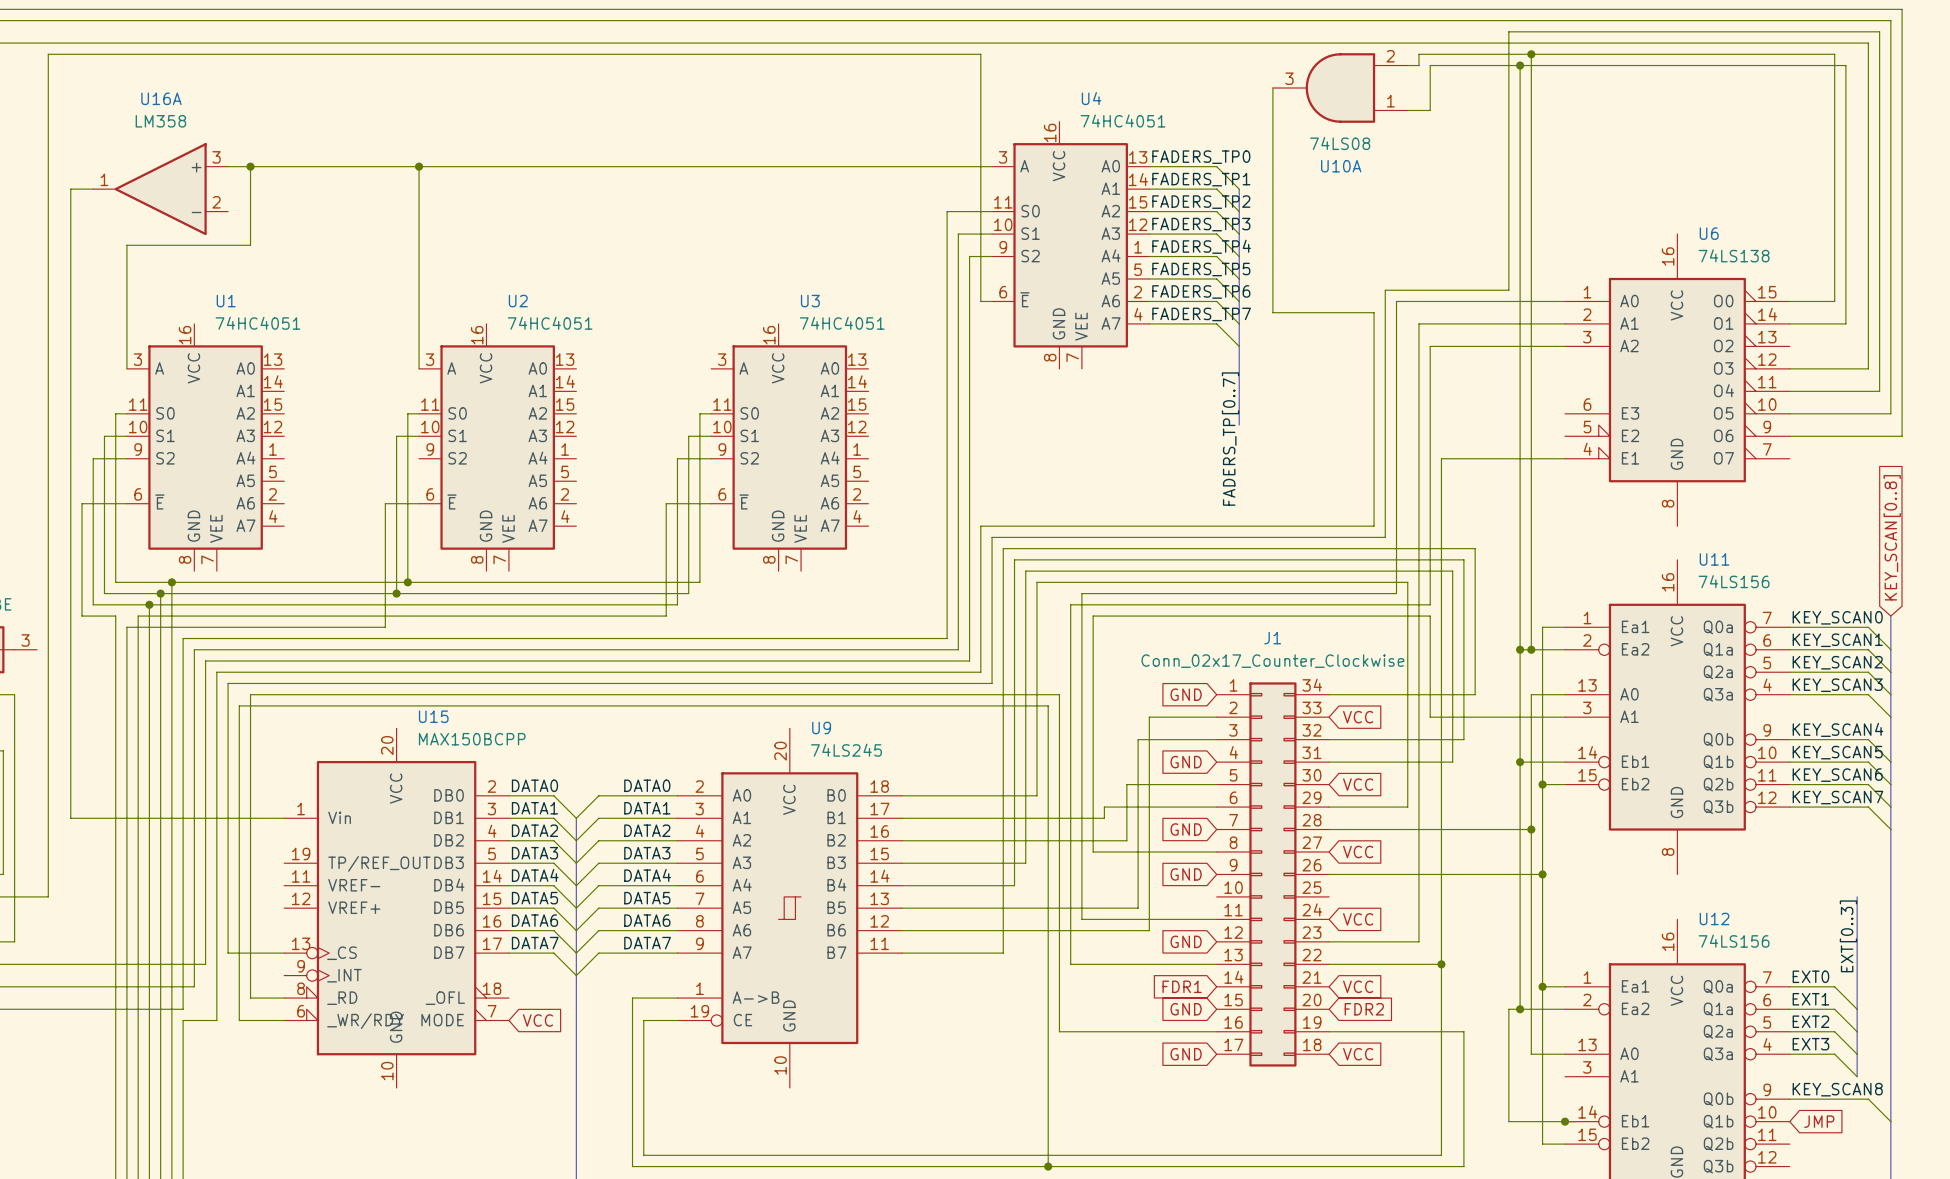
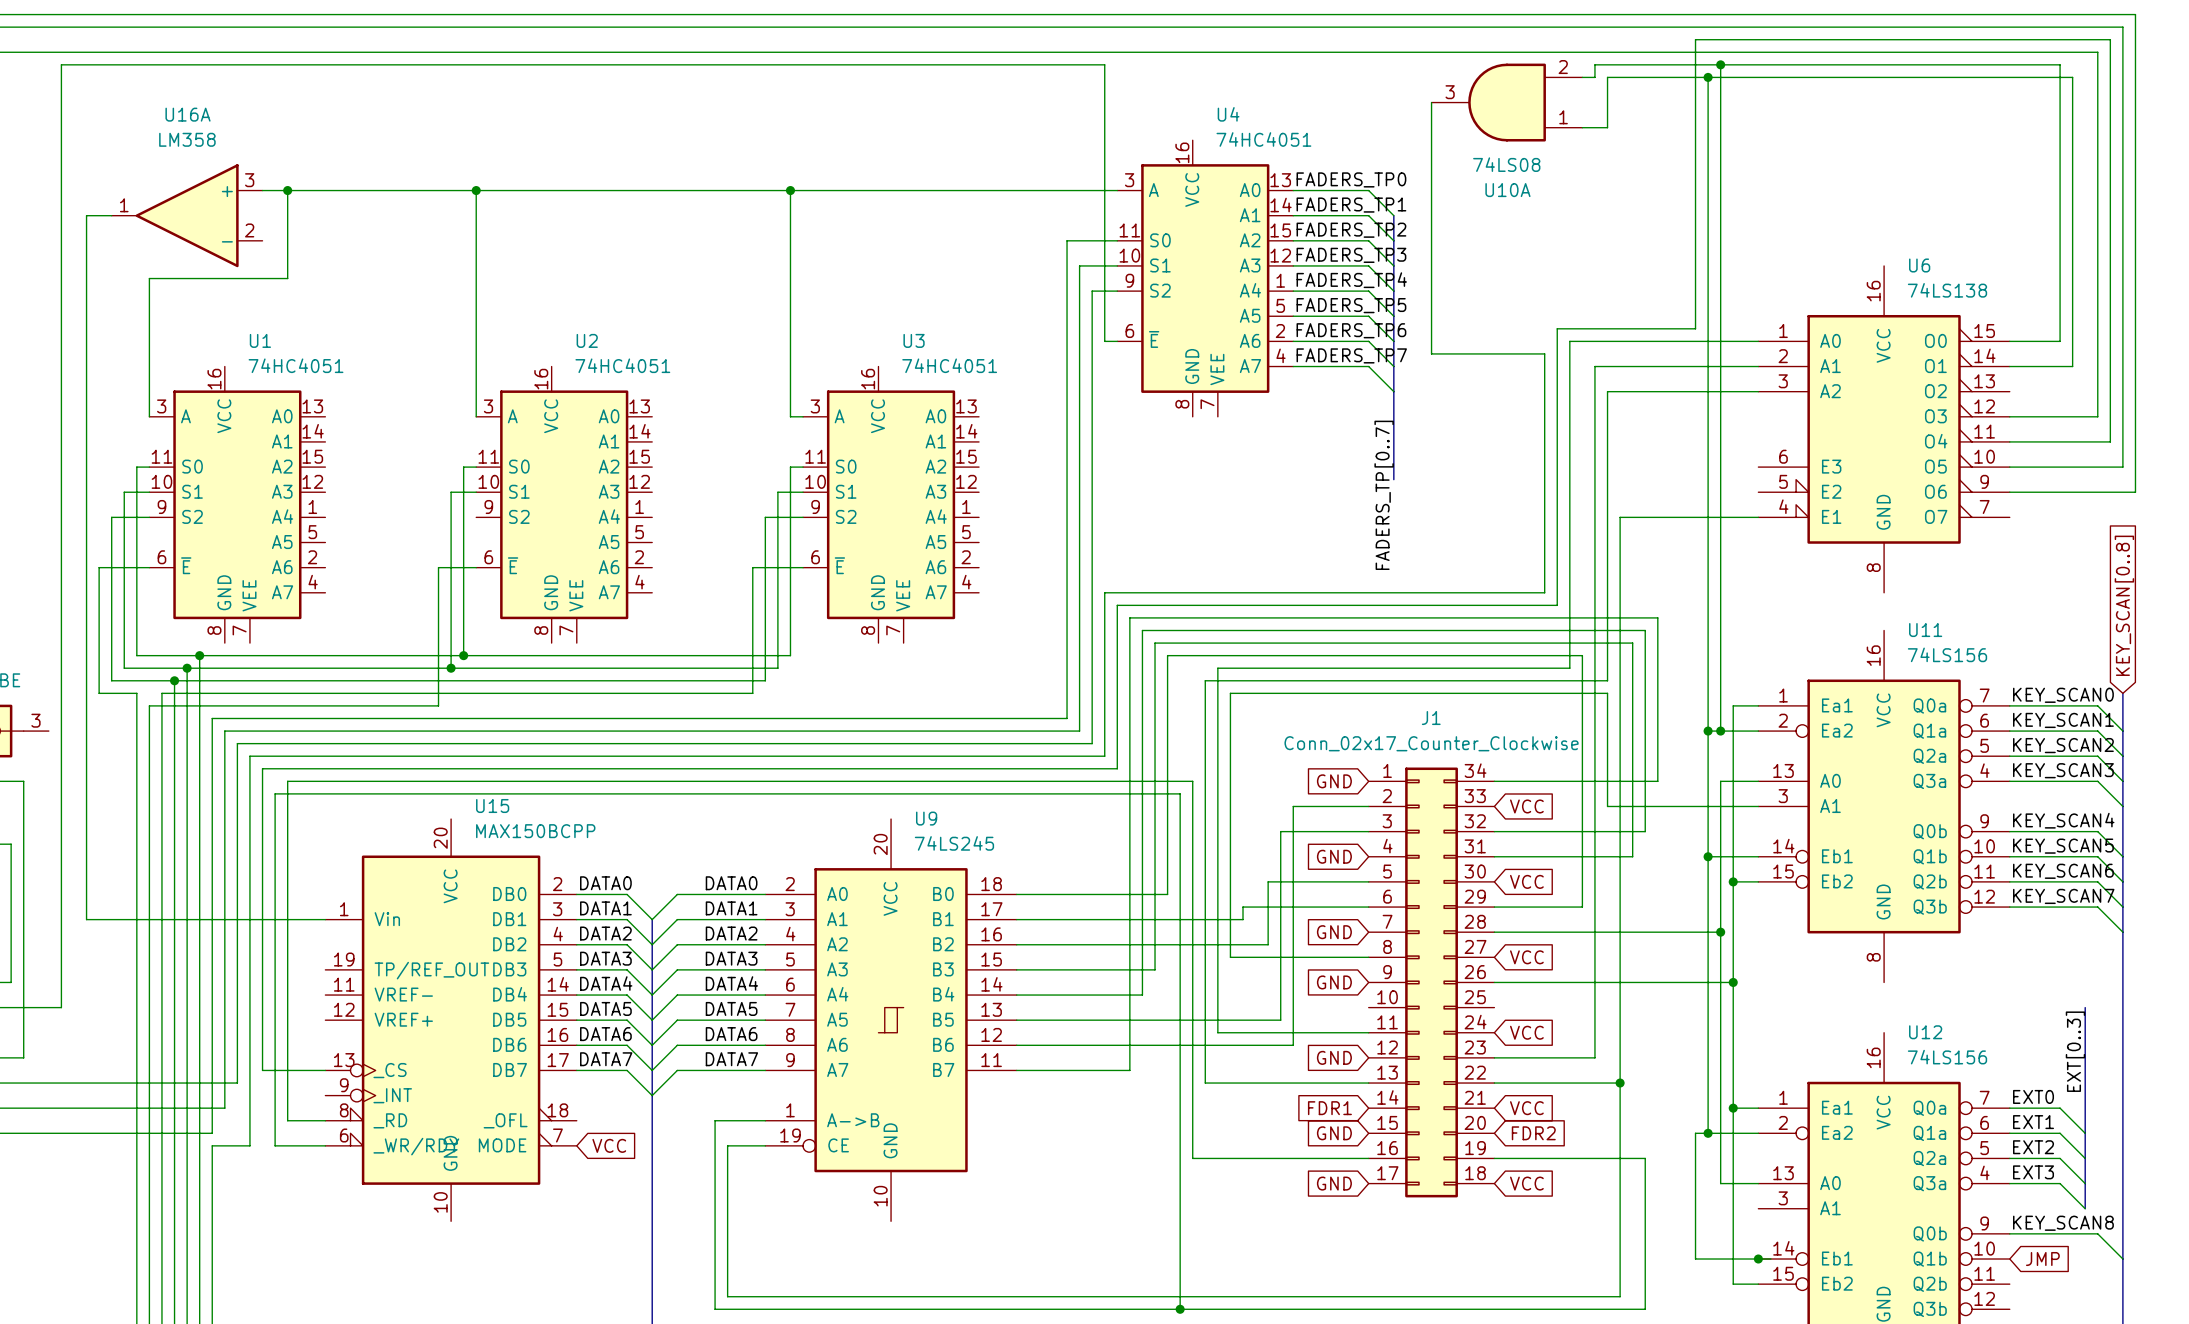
wire: none -> (790, 190) (790, 416) (803, 416)
junction: none -> (790, 190)

